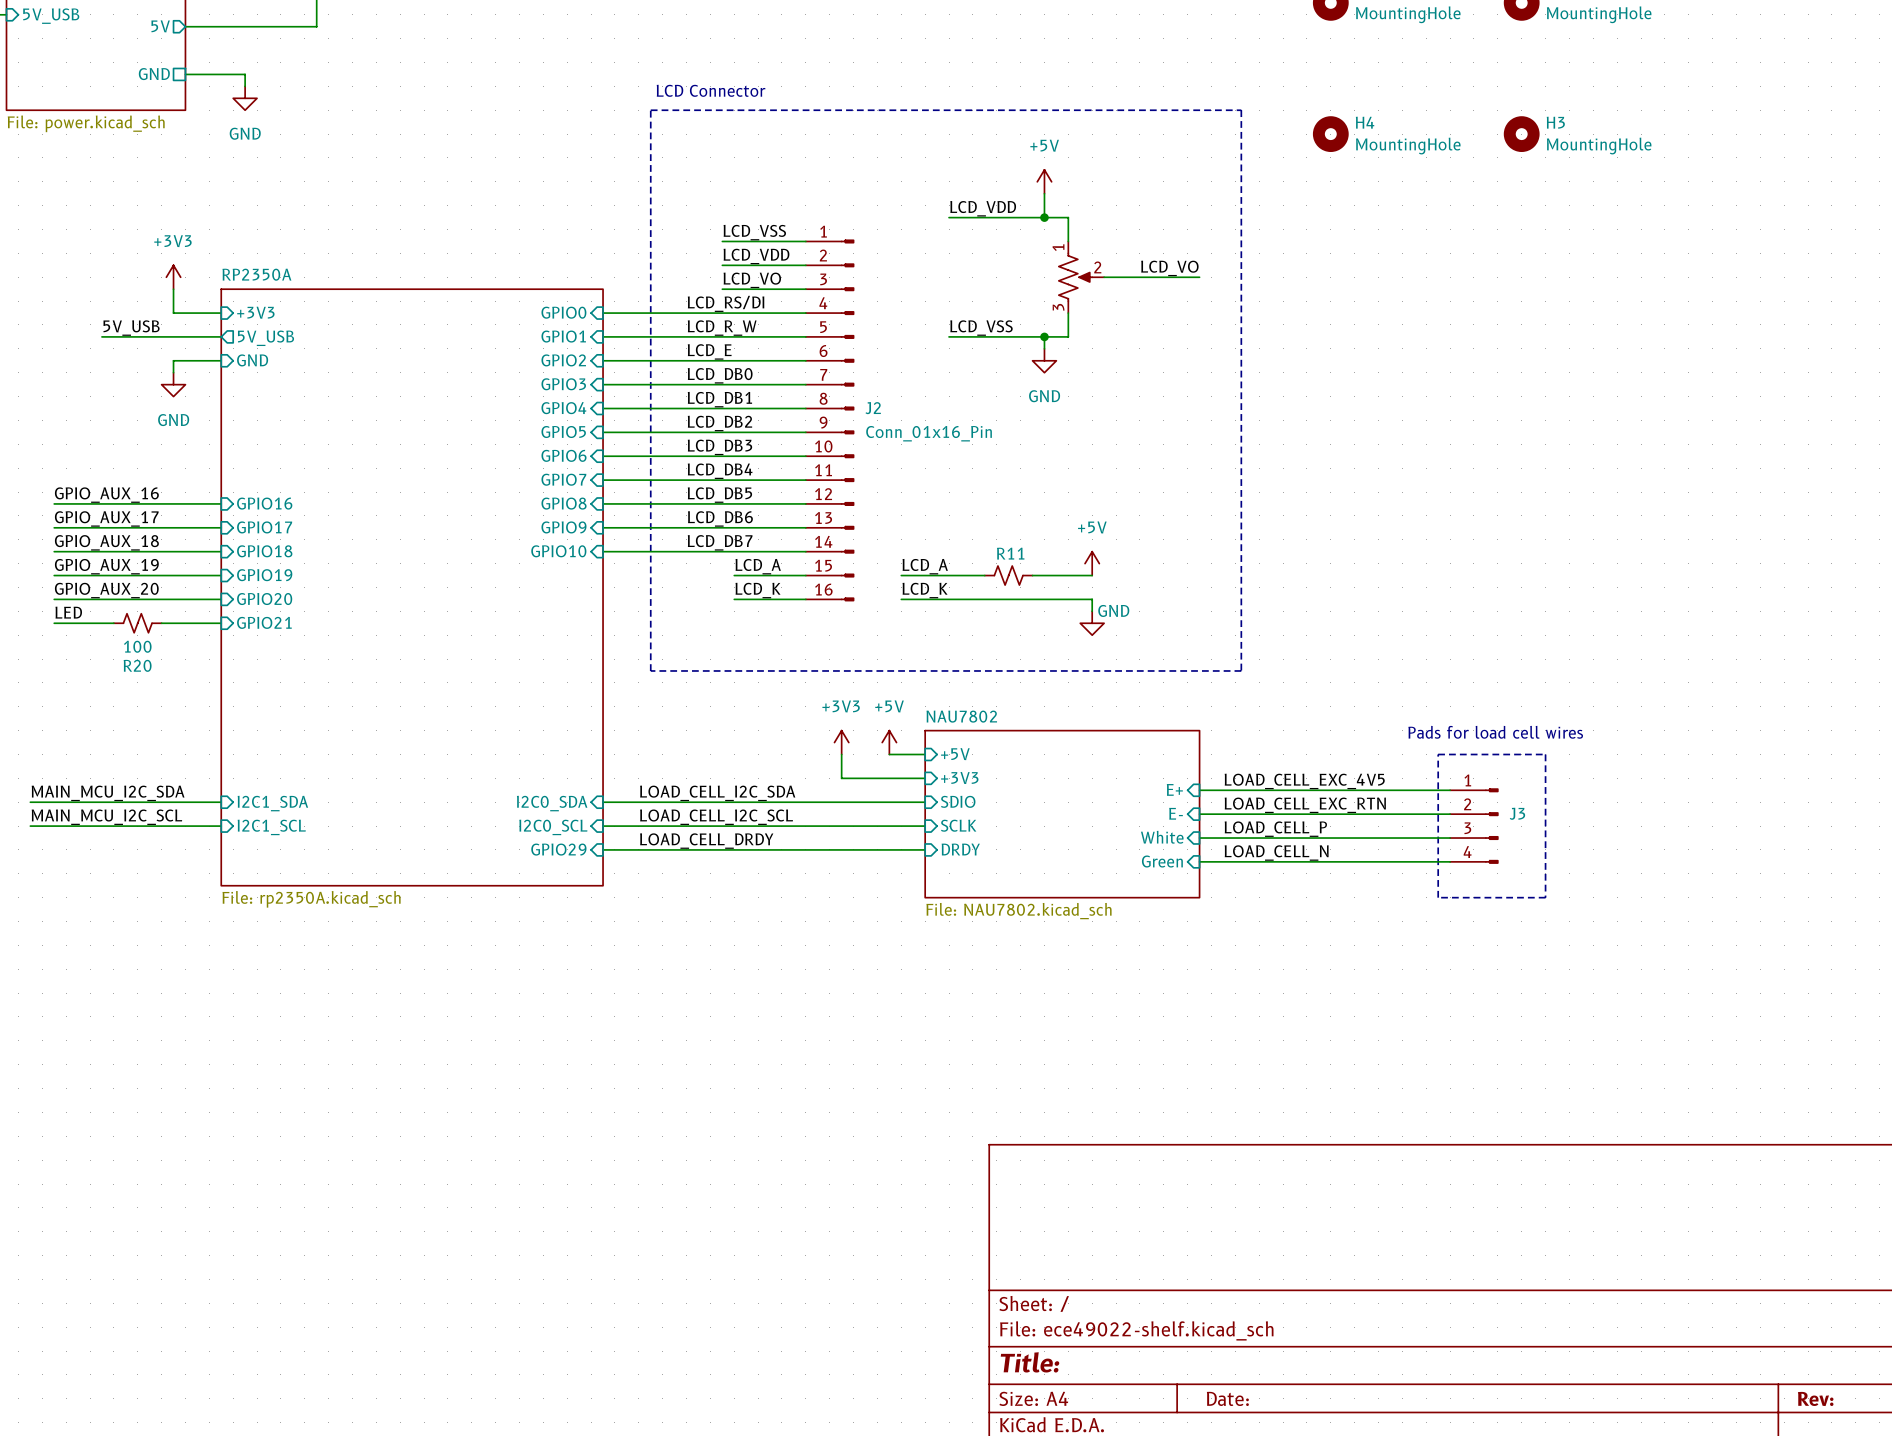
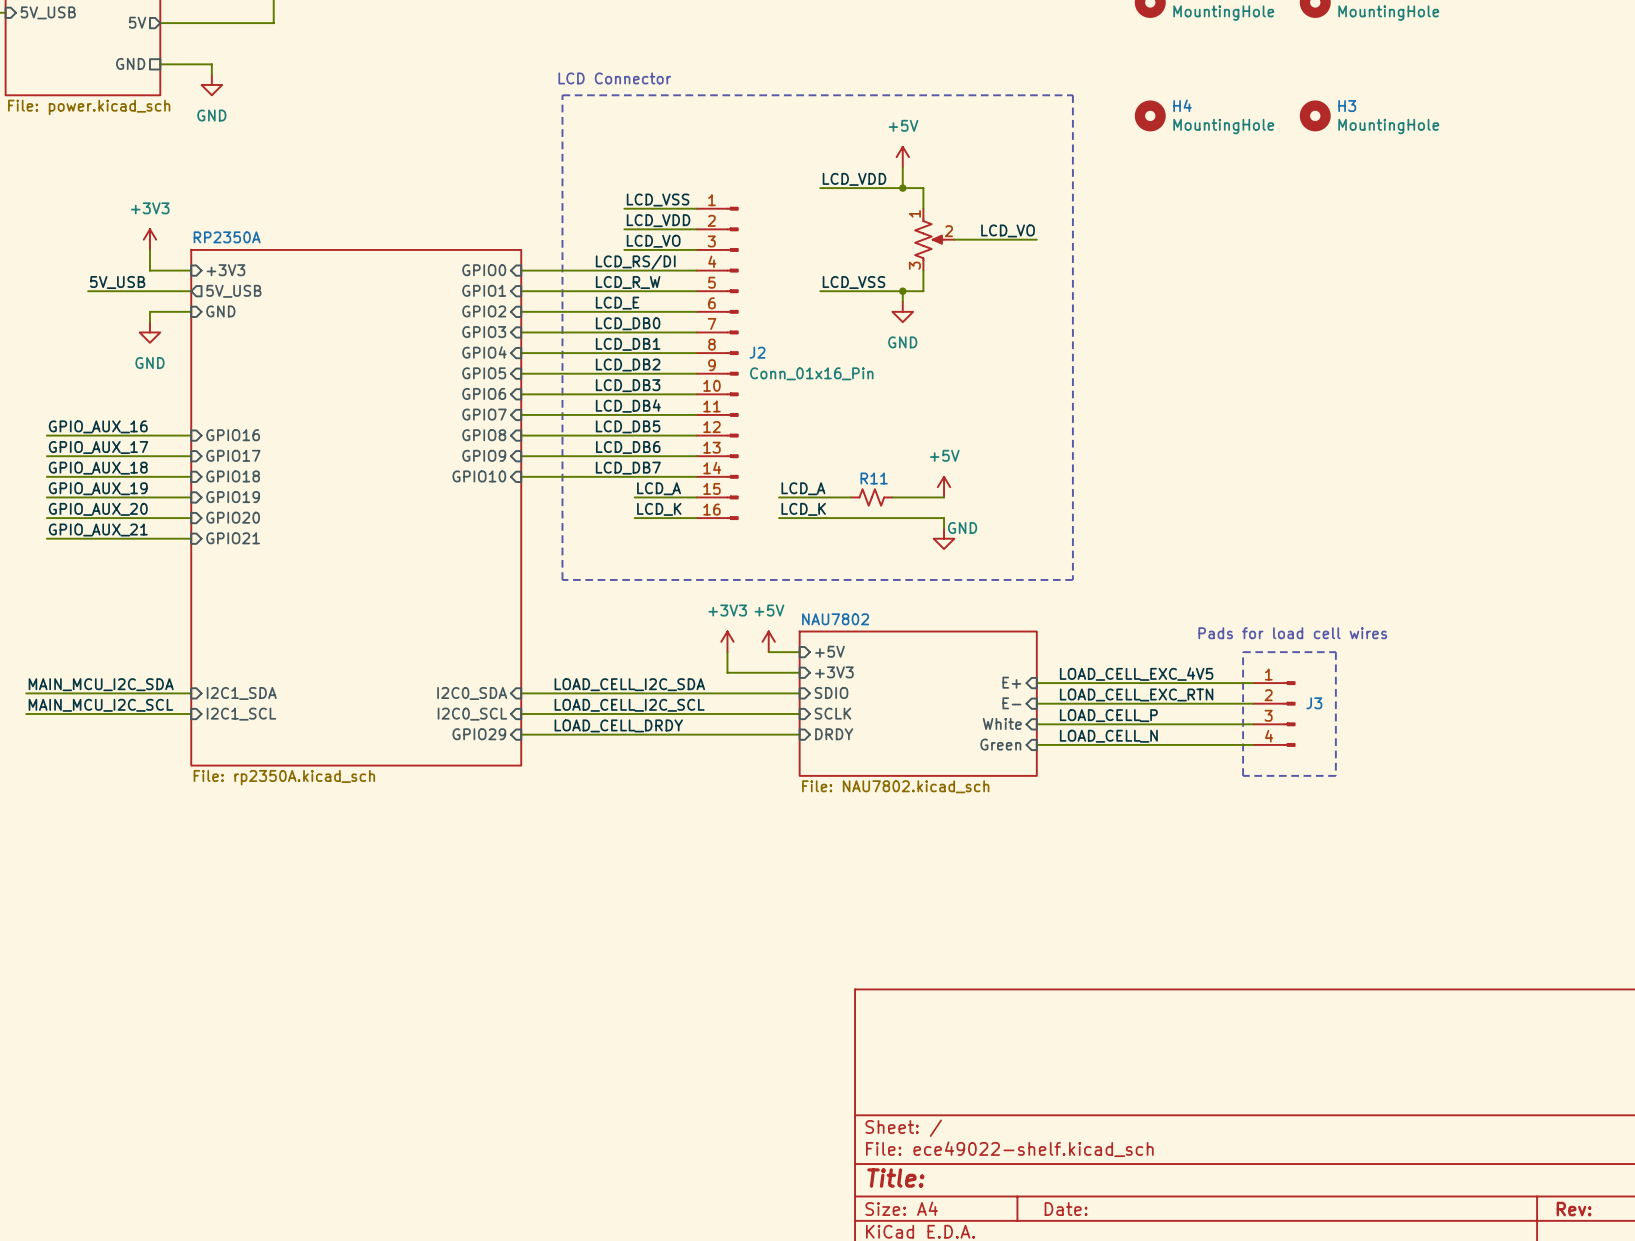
label: LED (68, 612) -> GPIO_AUX_21 (98, 529)
R20: 100 (137, 623) -> none

